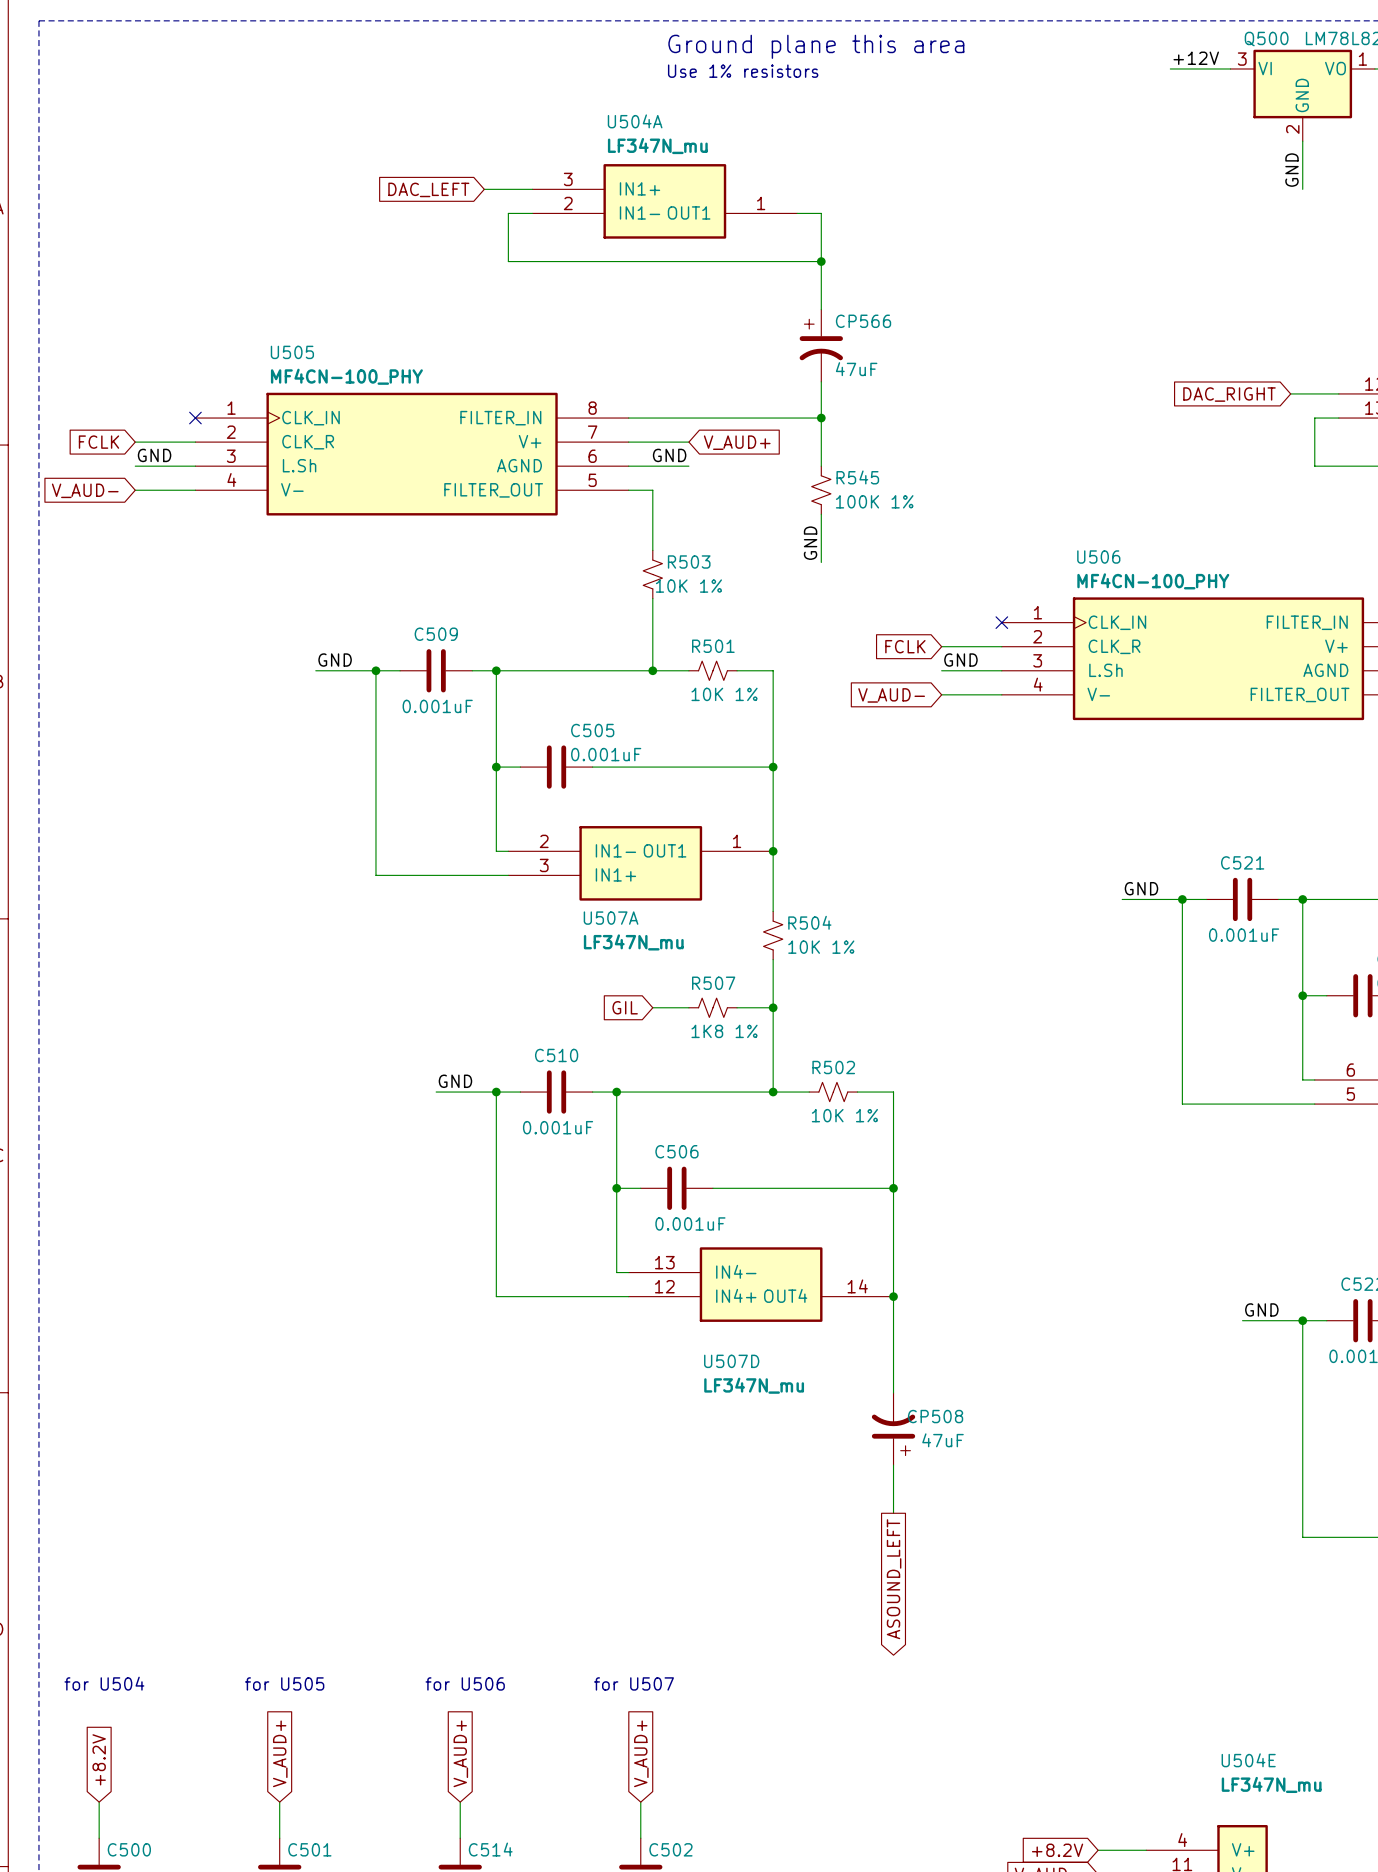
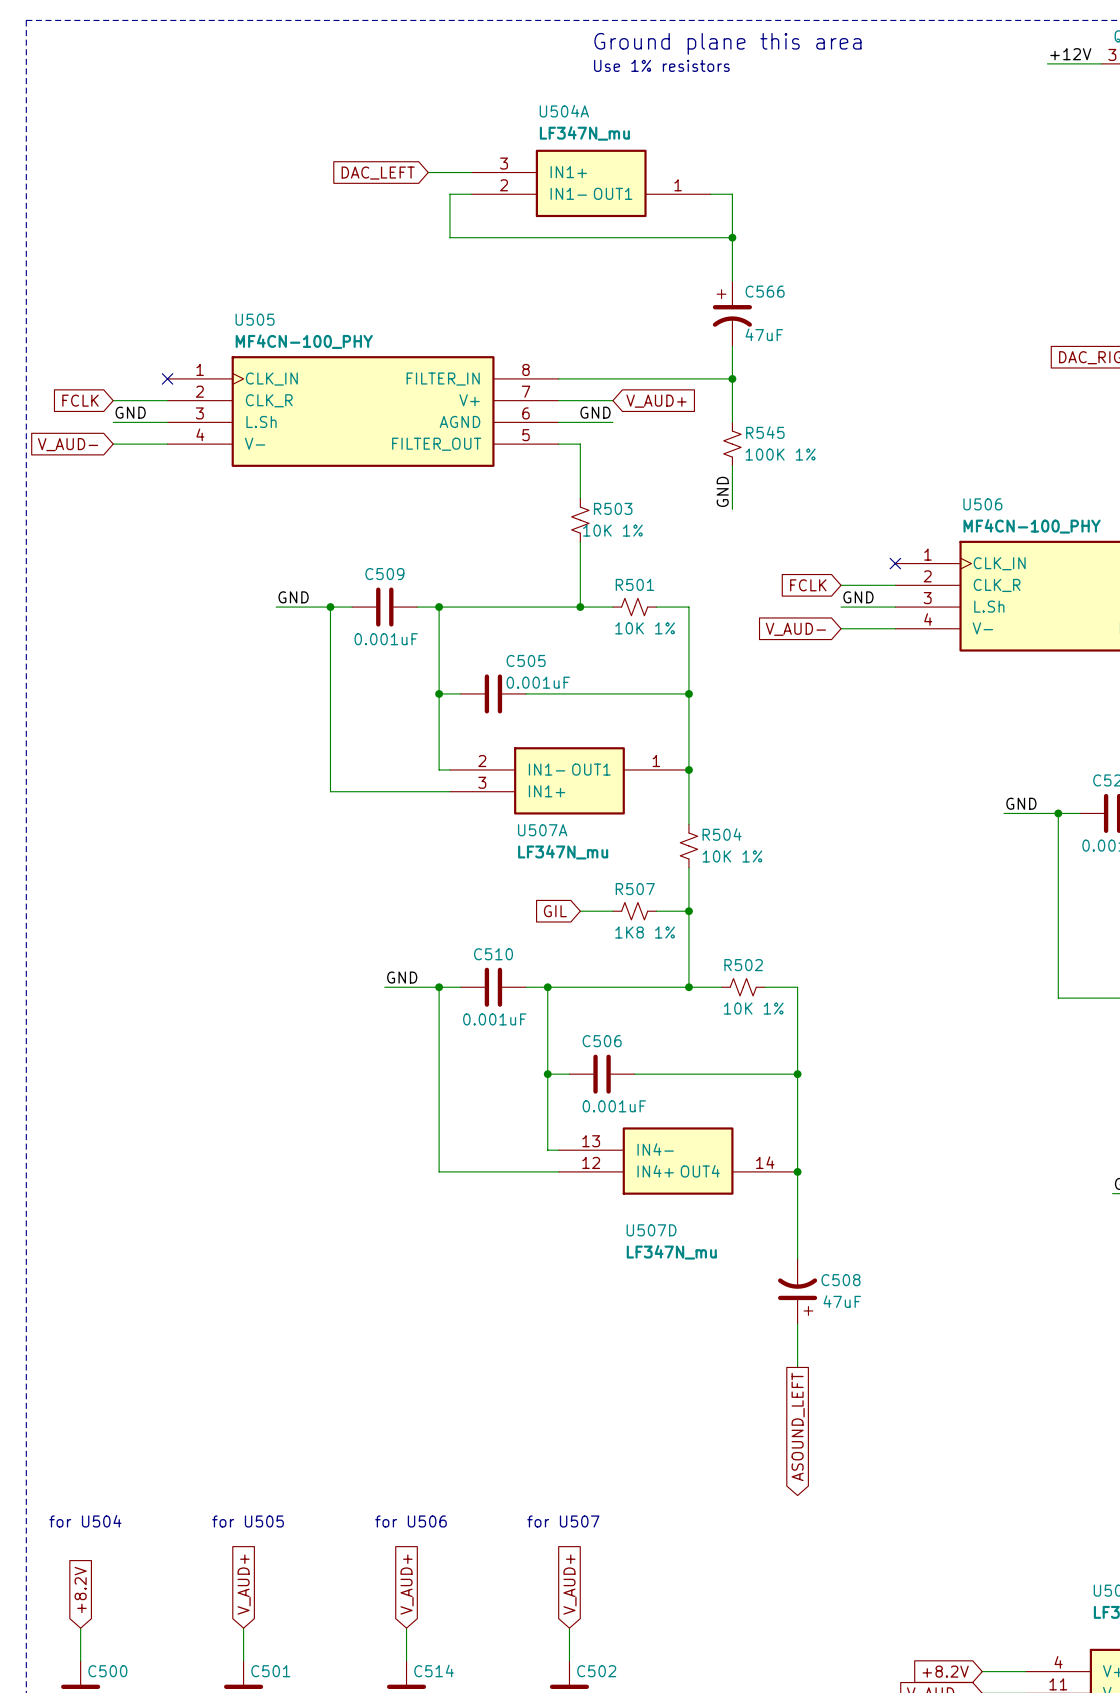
CP566 name: CP566 (863, 321) -> C566 (765, 291)
CP508 name: CP508 (935, 1416) -> C508 (840, 1280)

